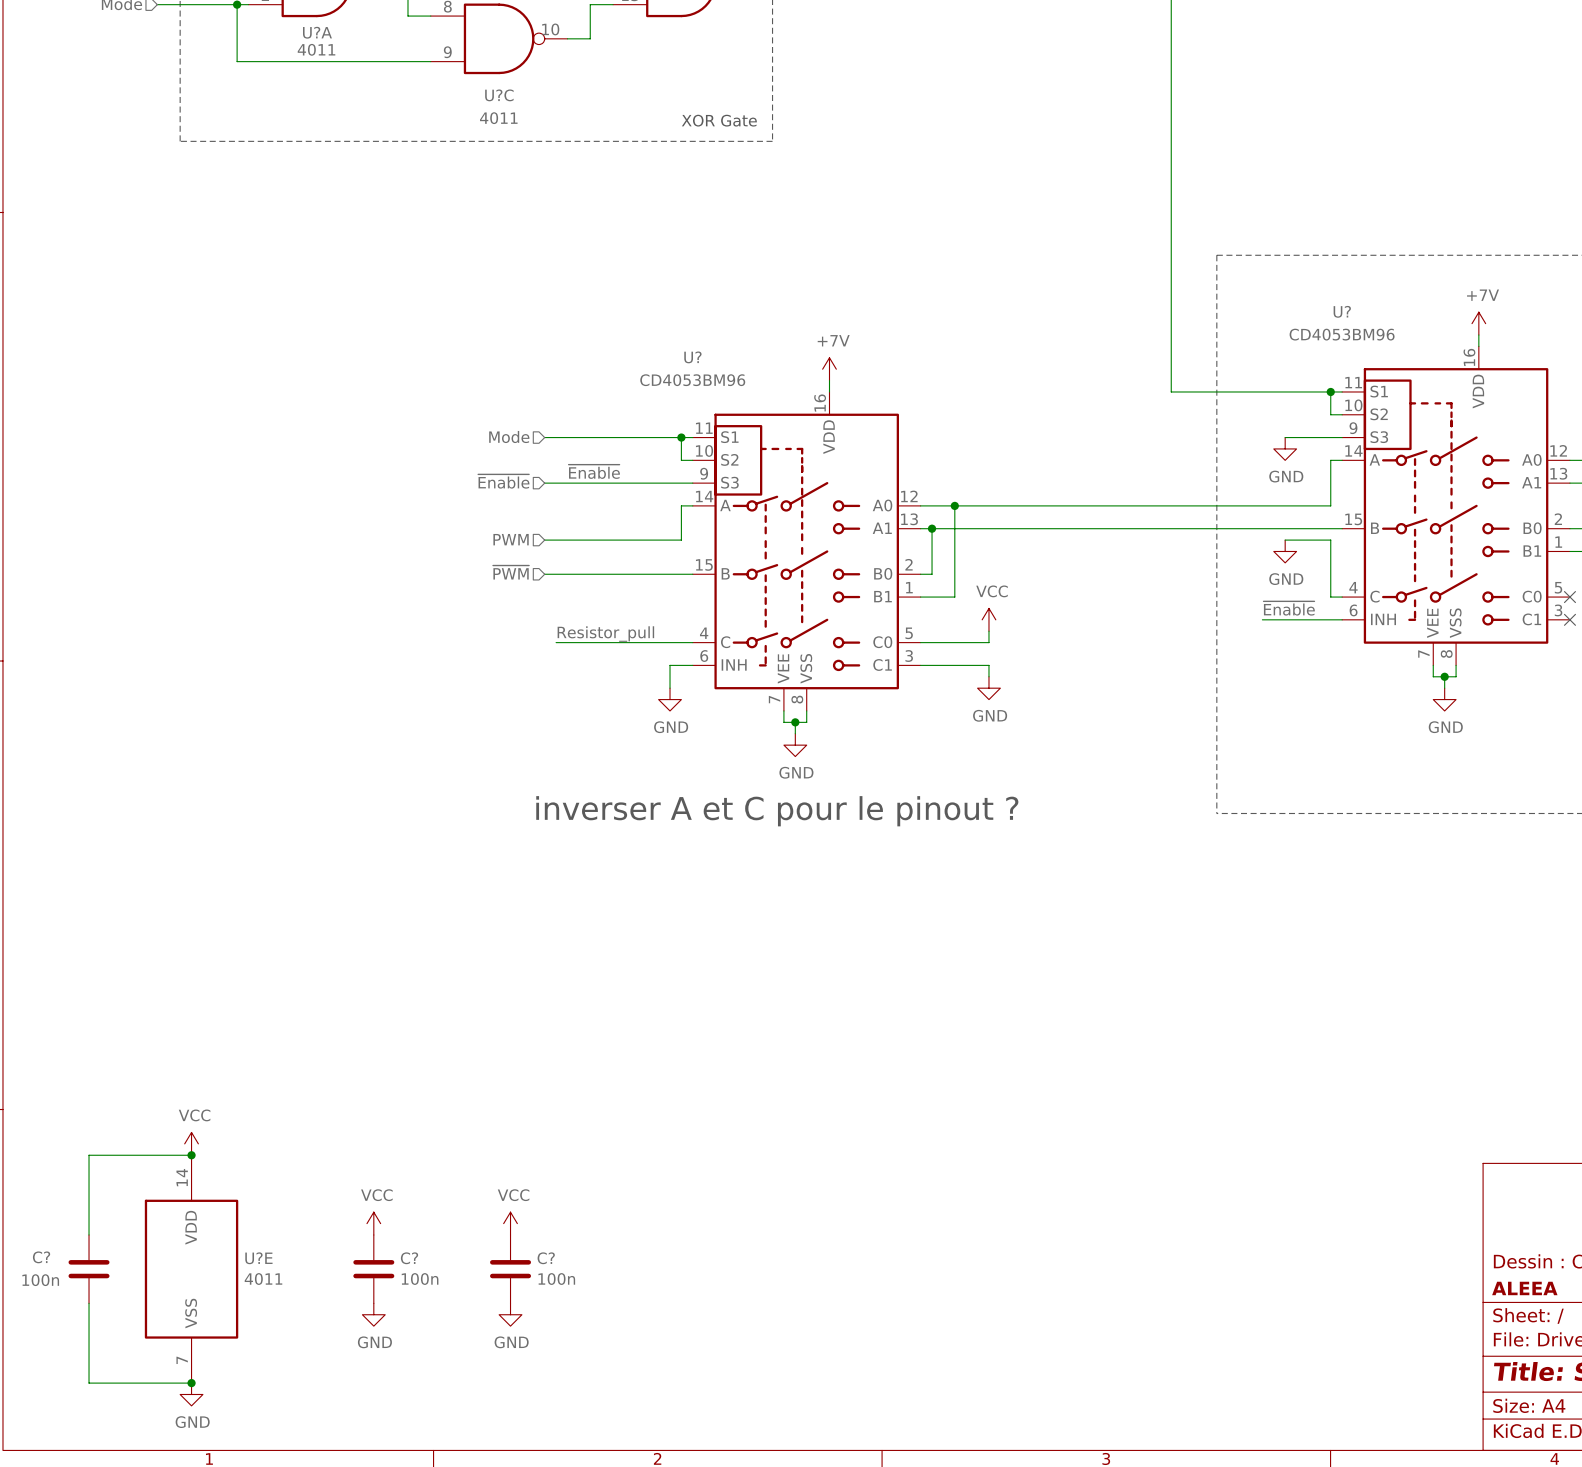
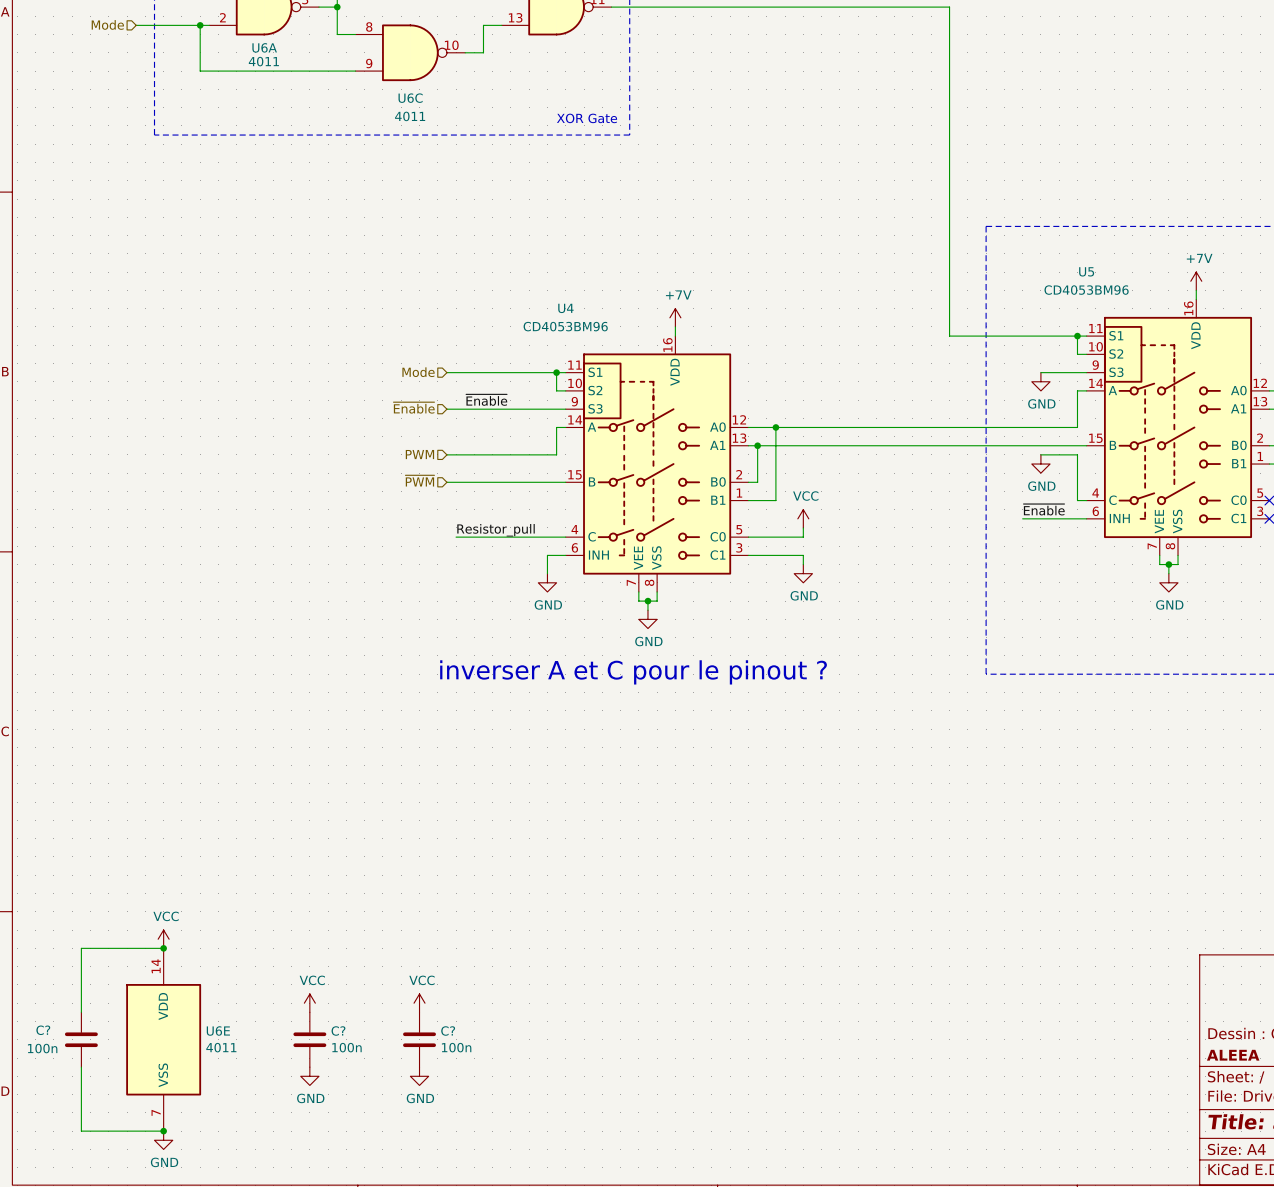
U?A name: U?A (317, 32) -> U6A (264, 47)
U?C name: U?C (499, 95) -> U6C (410, 98)
U? name: U? (1342, 311) -> U5 (1086, 271)
U? name: U? (692, 357) -> U4 (565, 308)
U?E name: U?E (258, 1258) -> U6E (218, 1031)

